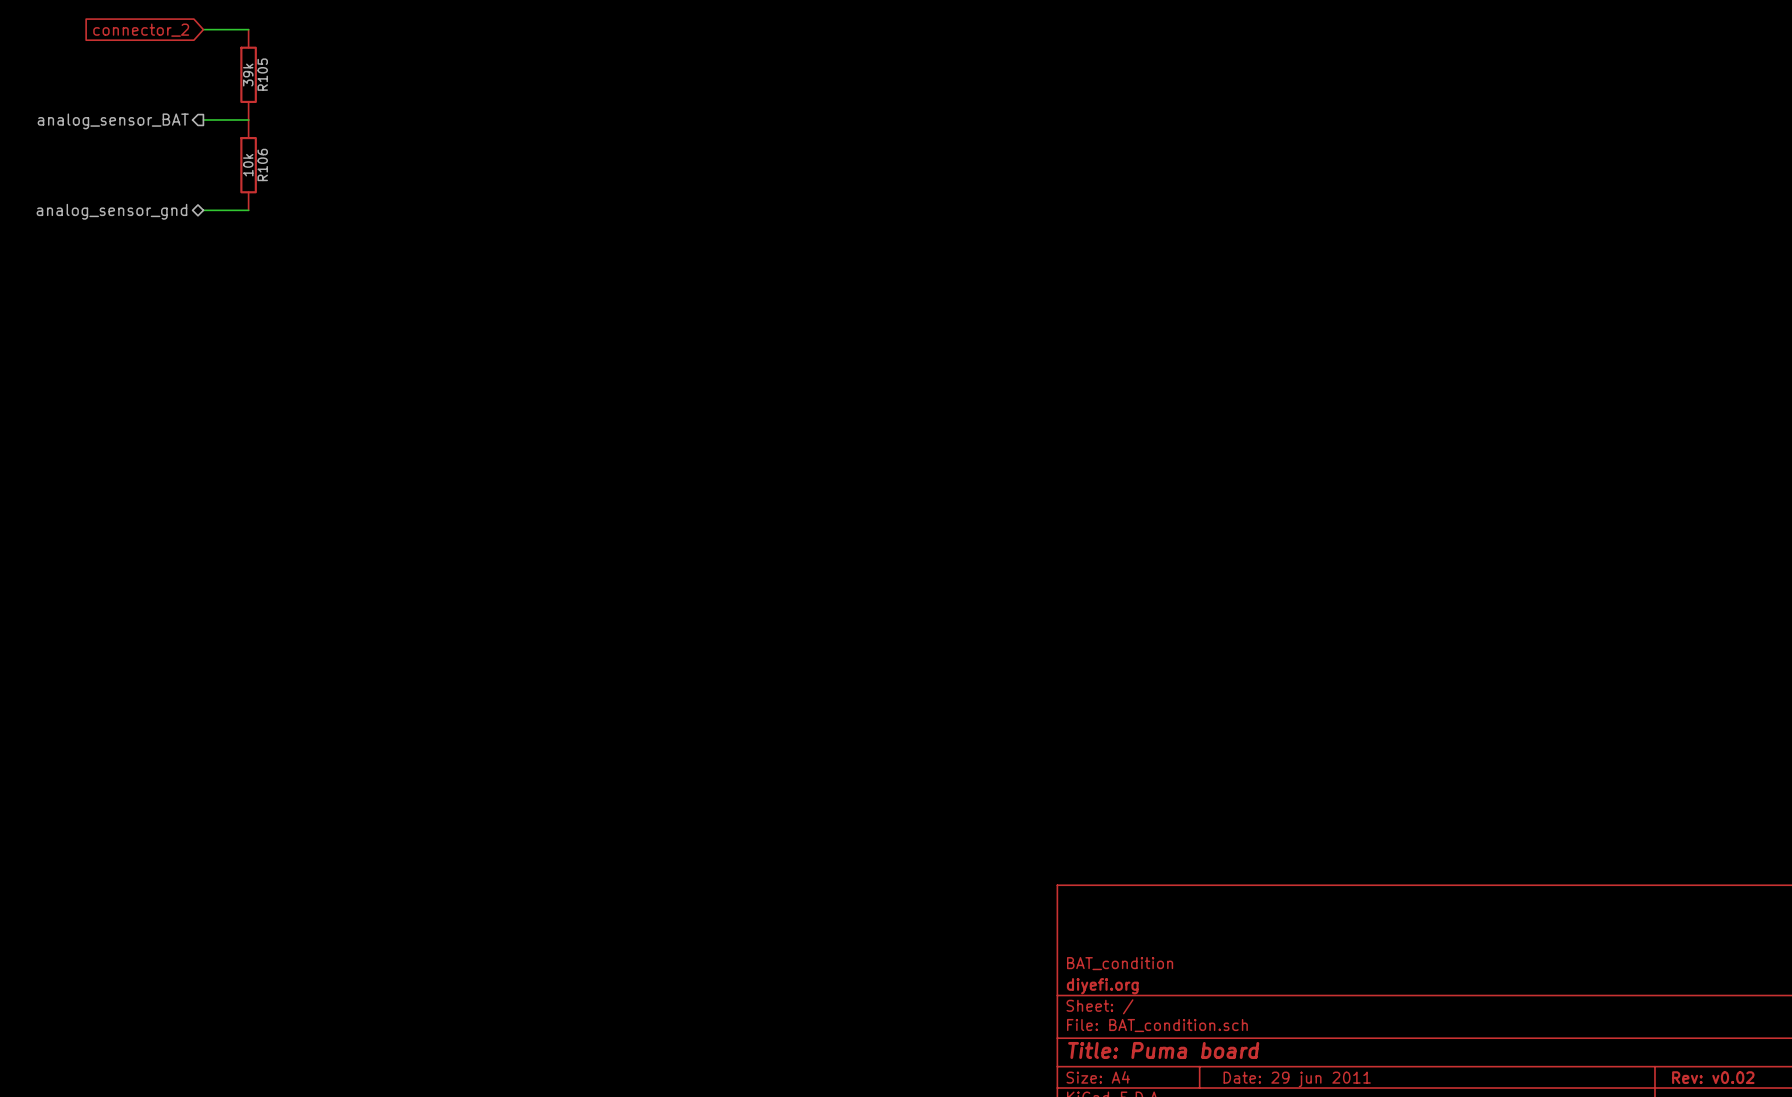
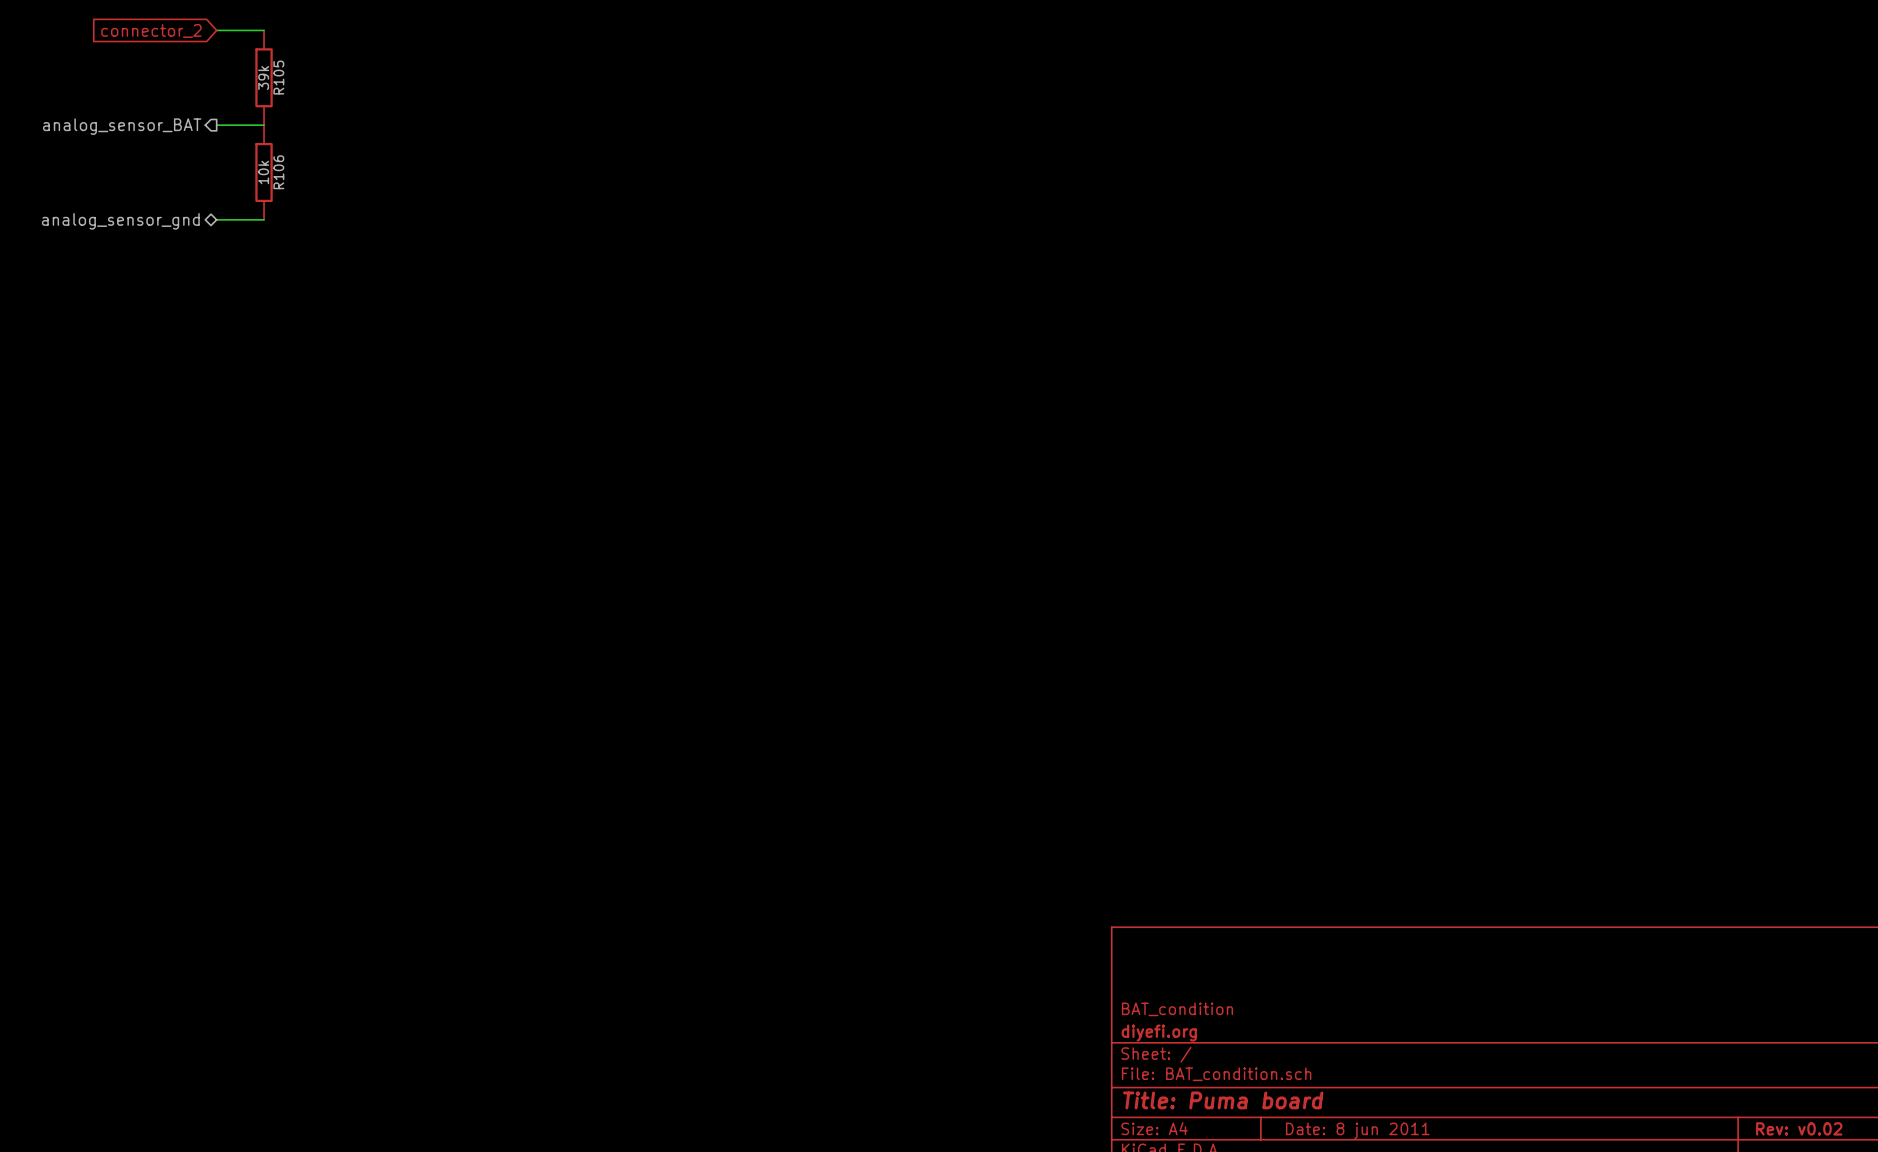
title block: Date: 29 jun 2011 (1297, 1079) -> Date: 8 jun 2011 (1357, 1130)

